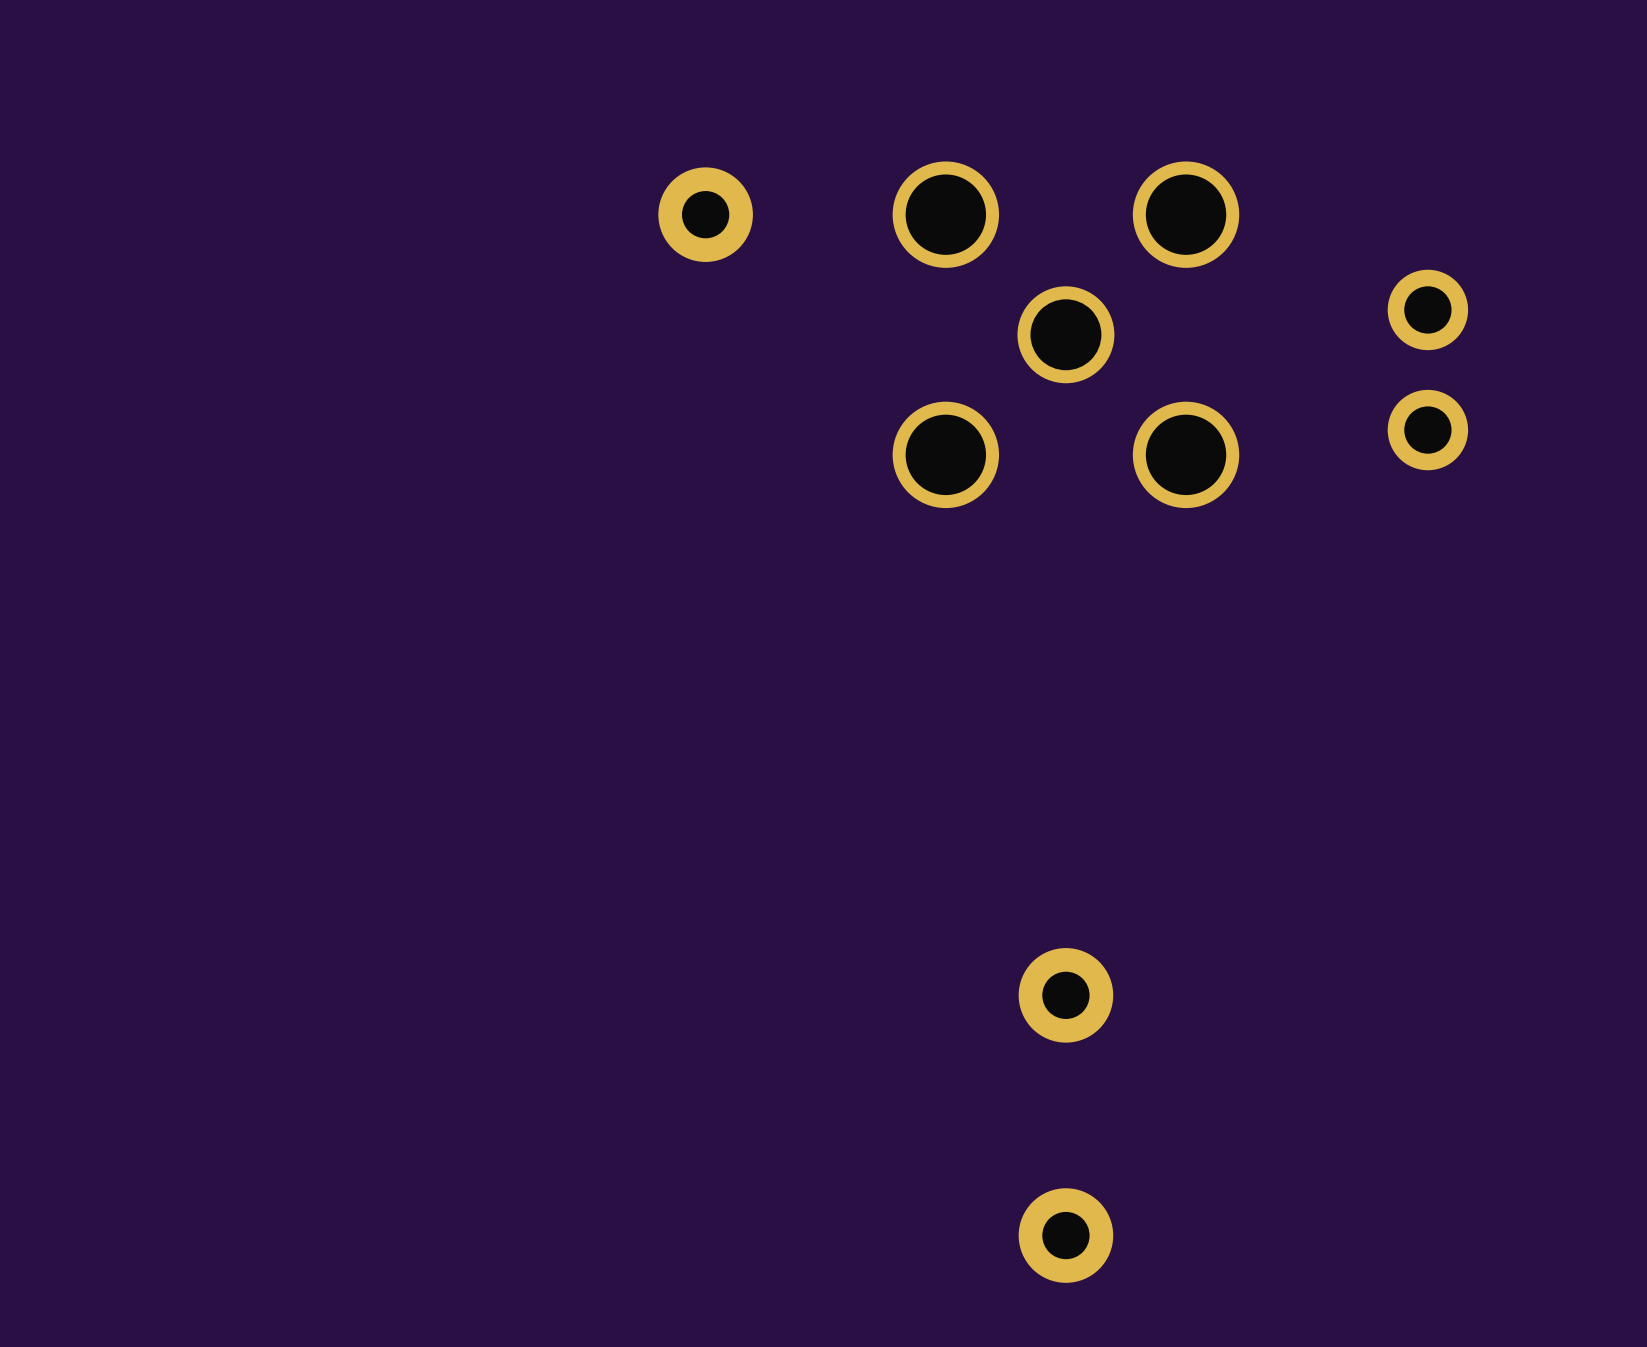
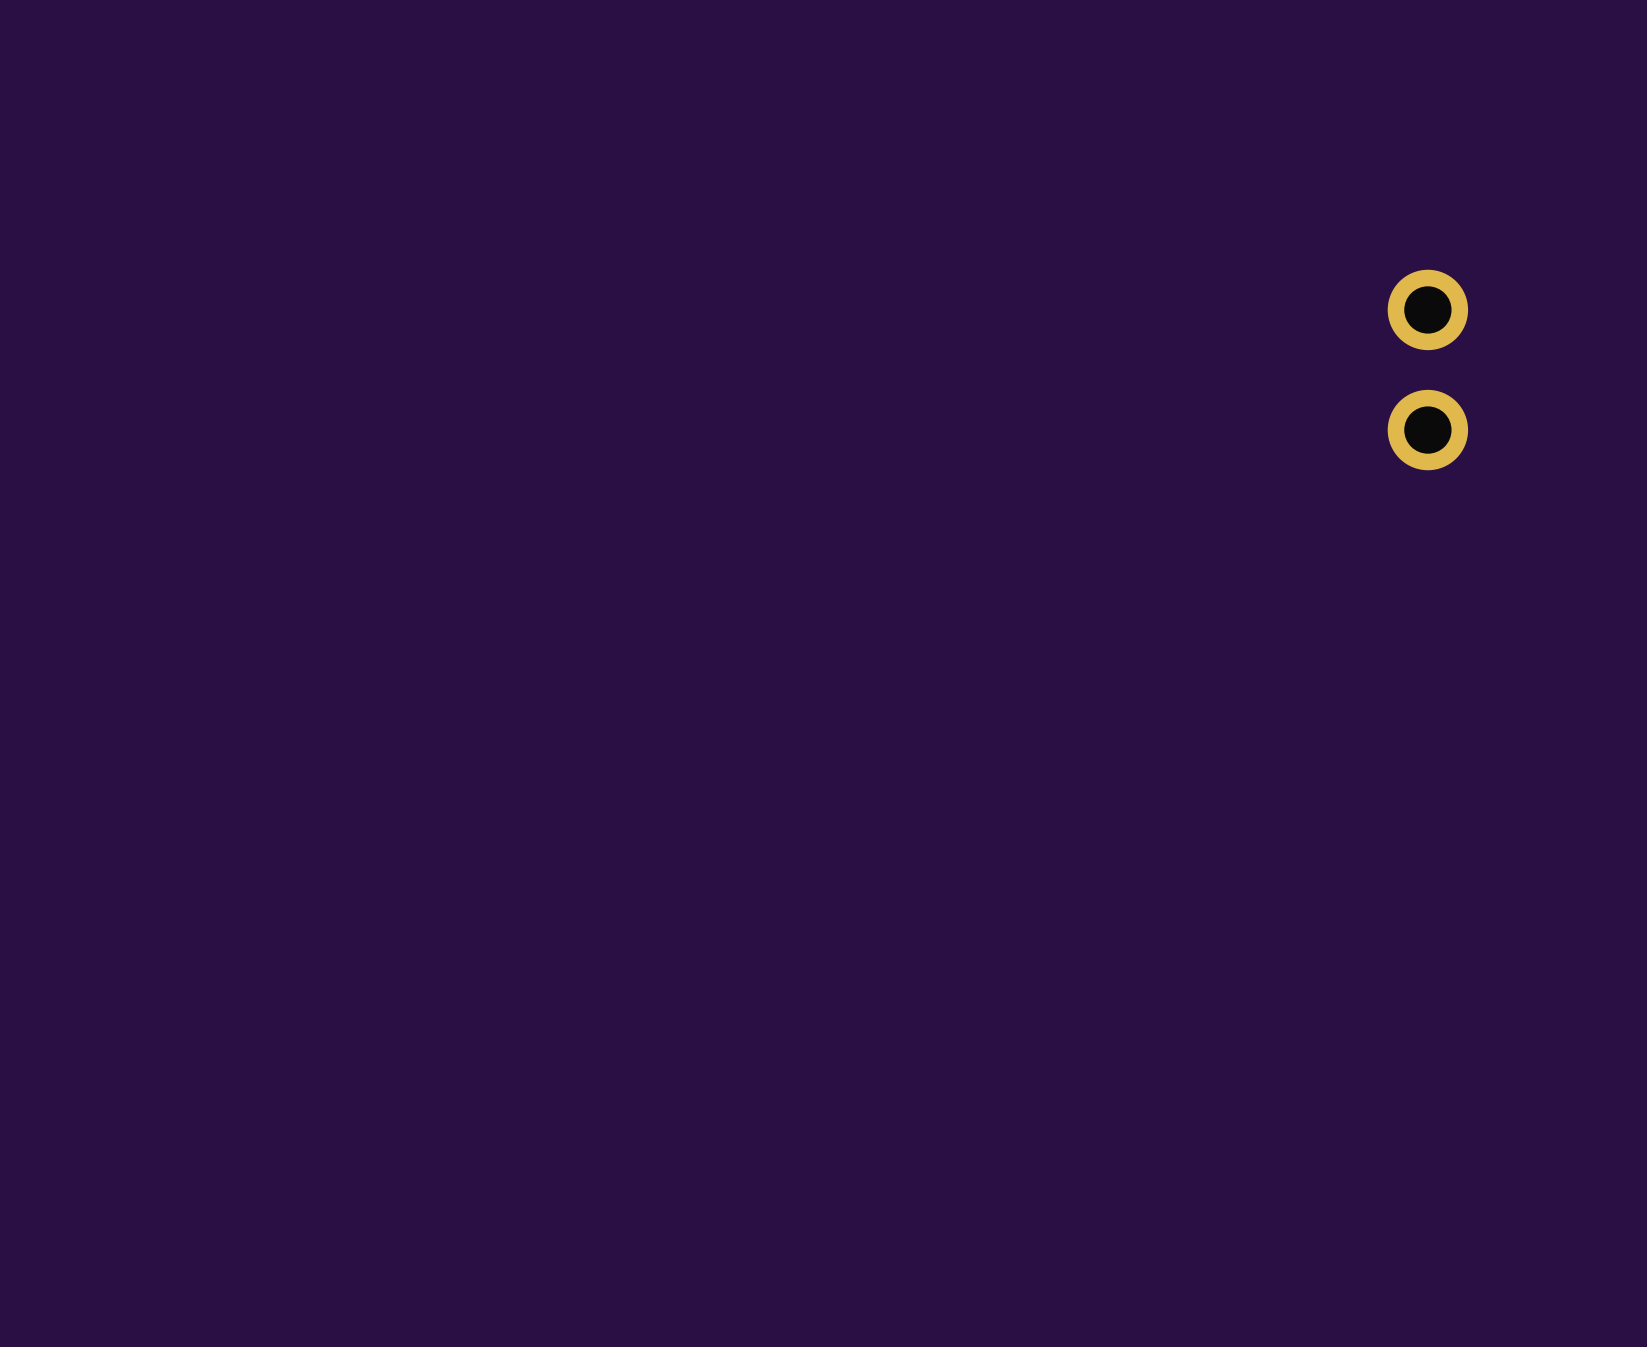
part: (705, 214) -> none
part: (1065, 334) -> none
part: (1065, 995) -> none
part: (1065, 1235) -> none

